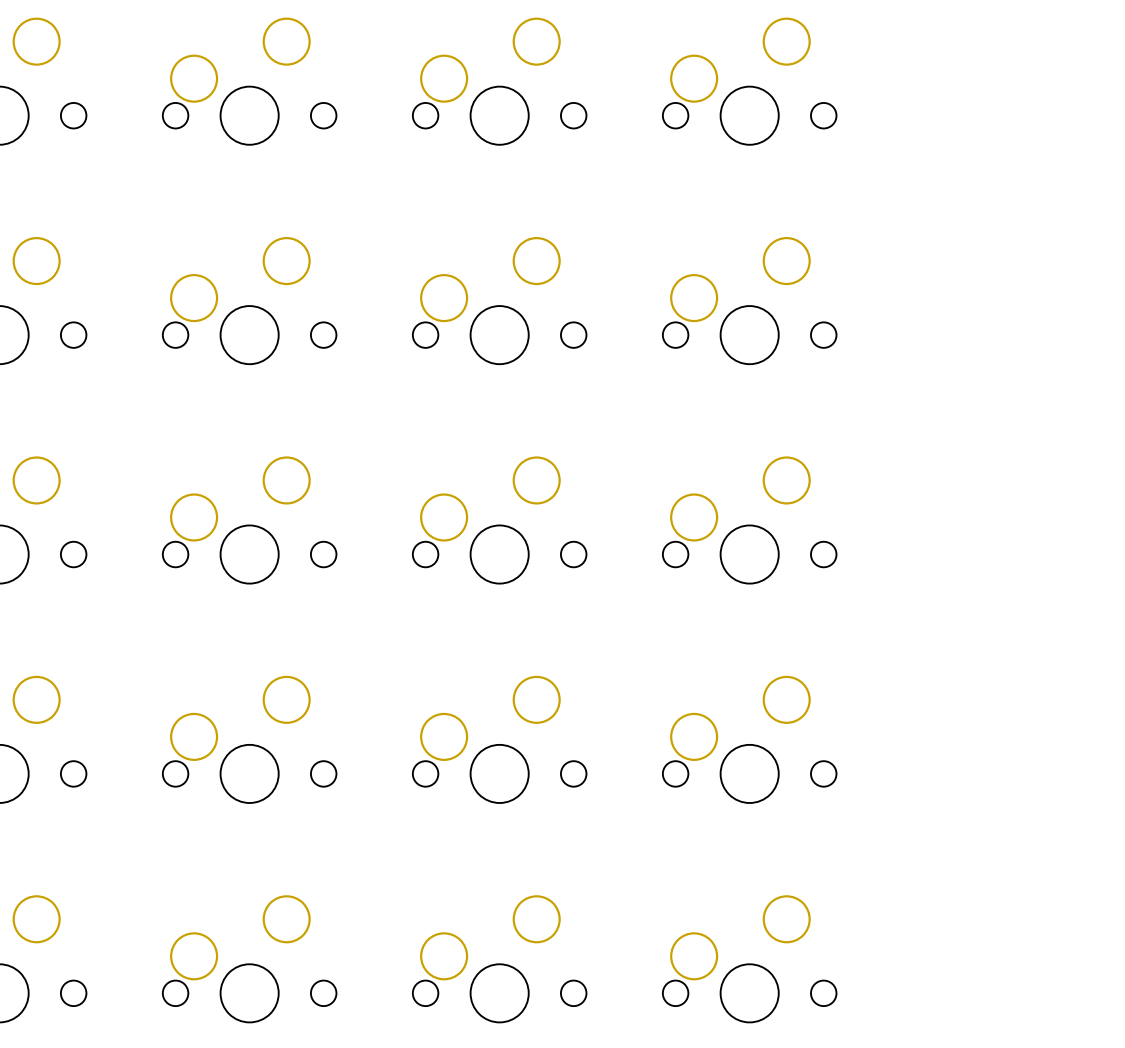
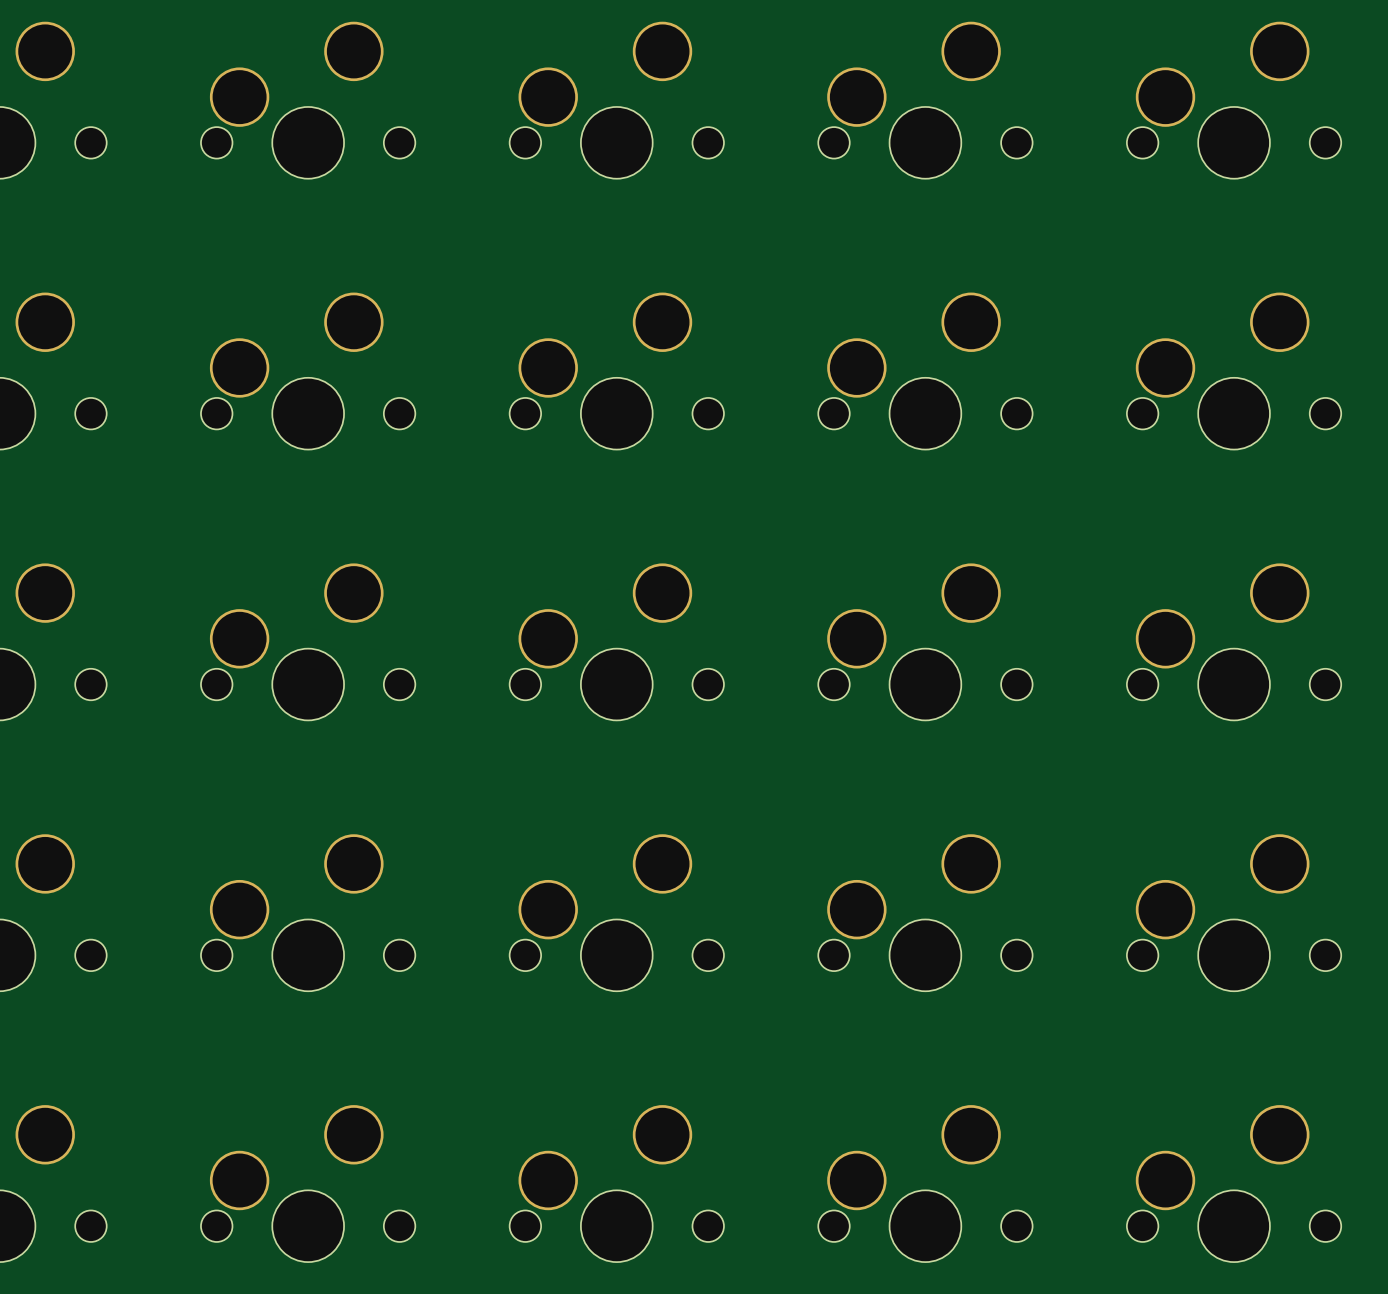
part: none -> (1234, 100)
part: none -> (1234, 371)
part: none -> (1234, 641)
part: none -> (1234, 912)
part: none -> (1234, 1183)

